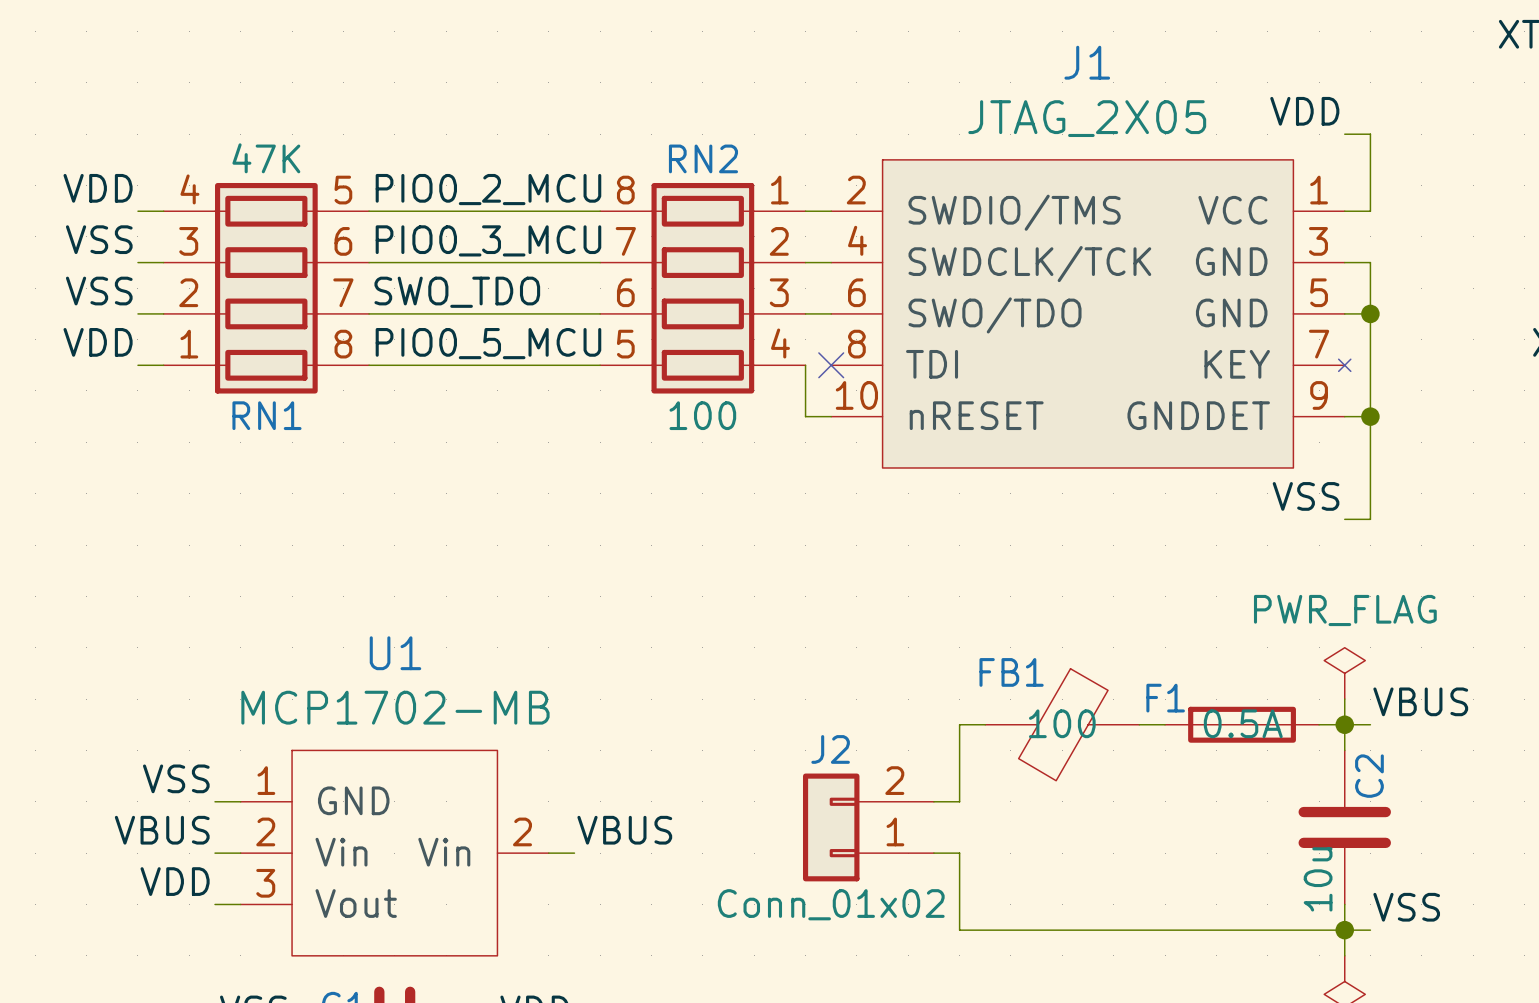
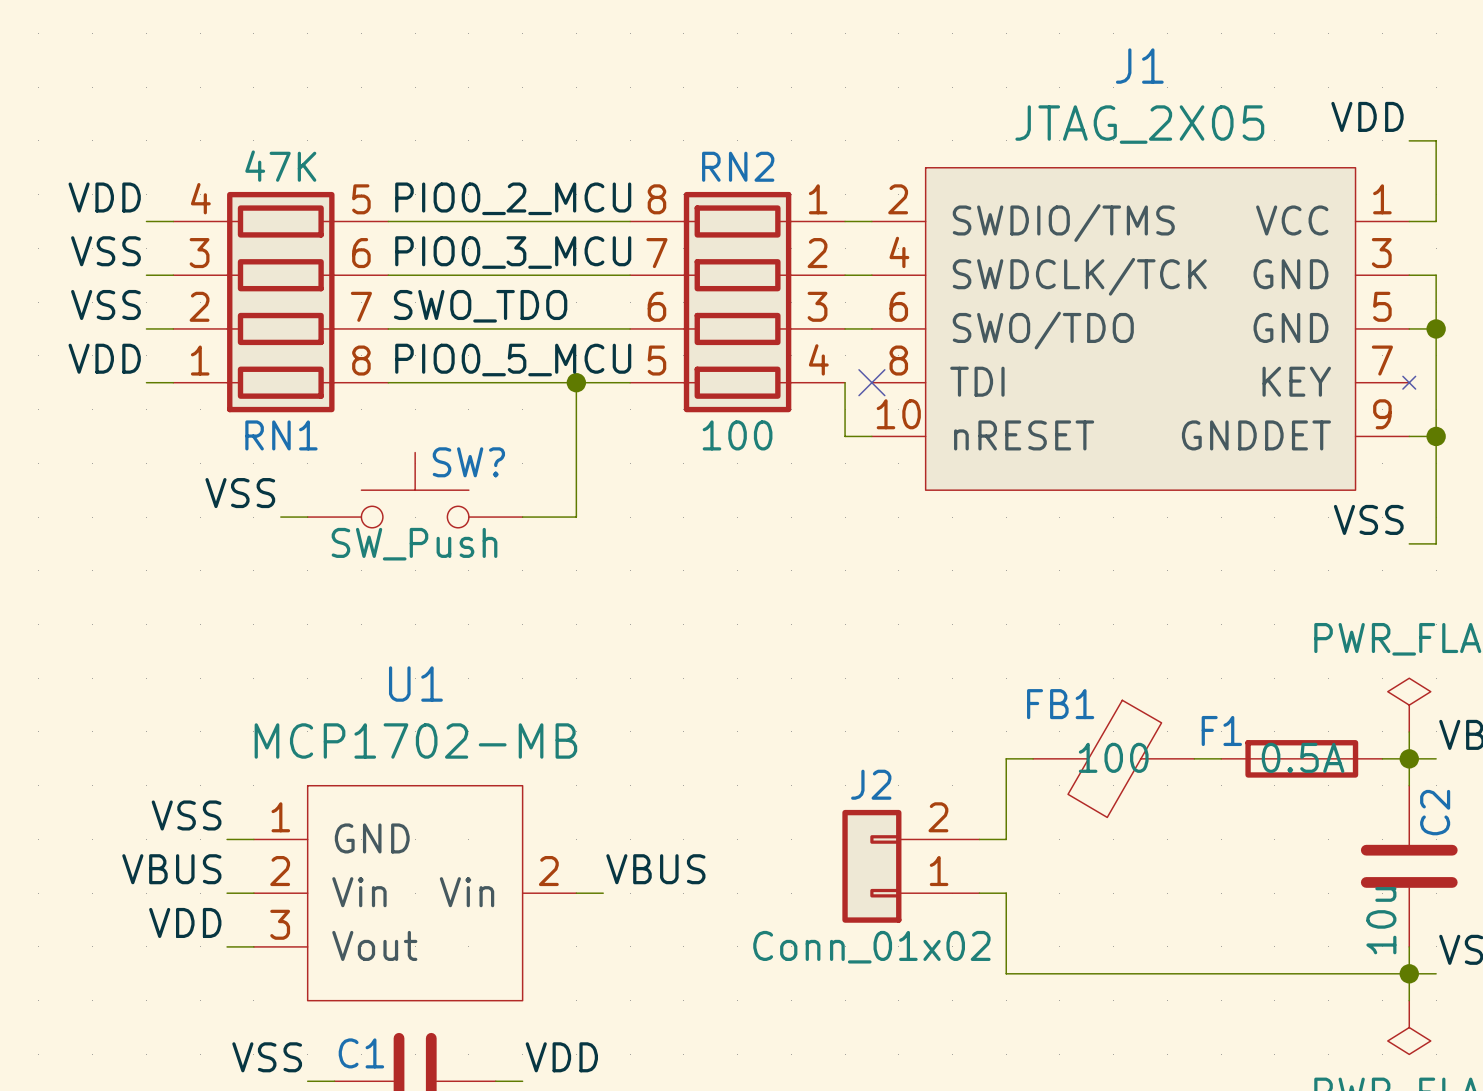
wire: none -> (576, 382) (576, 517) (522, 517)
junction: none -> (576, 382)
SW?: none -> SW_Push (415, 490)
label: none -> VSS (240, 493)
wire: none -> (280, 517) (307, 517)

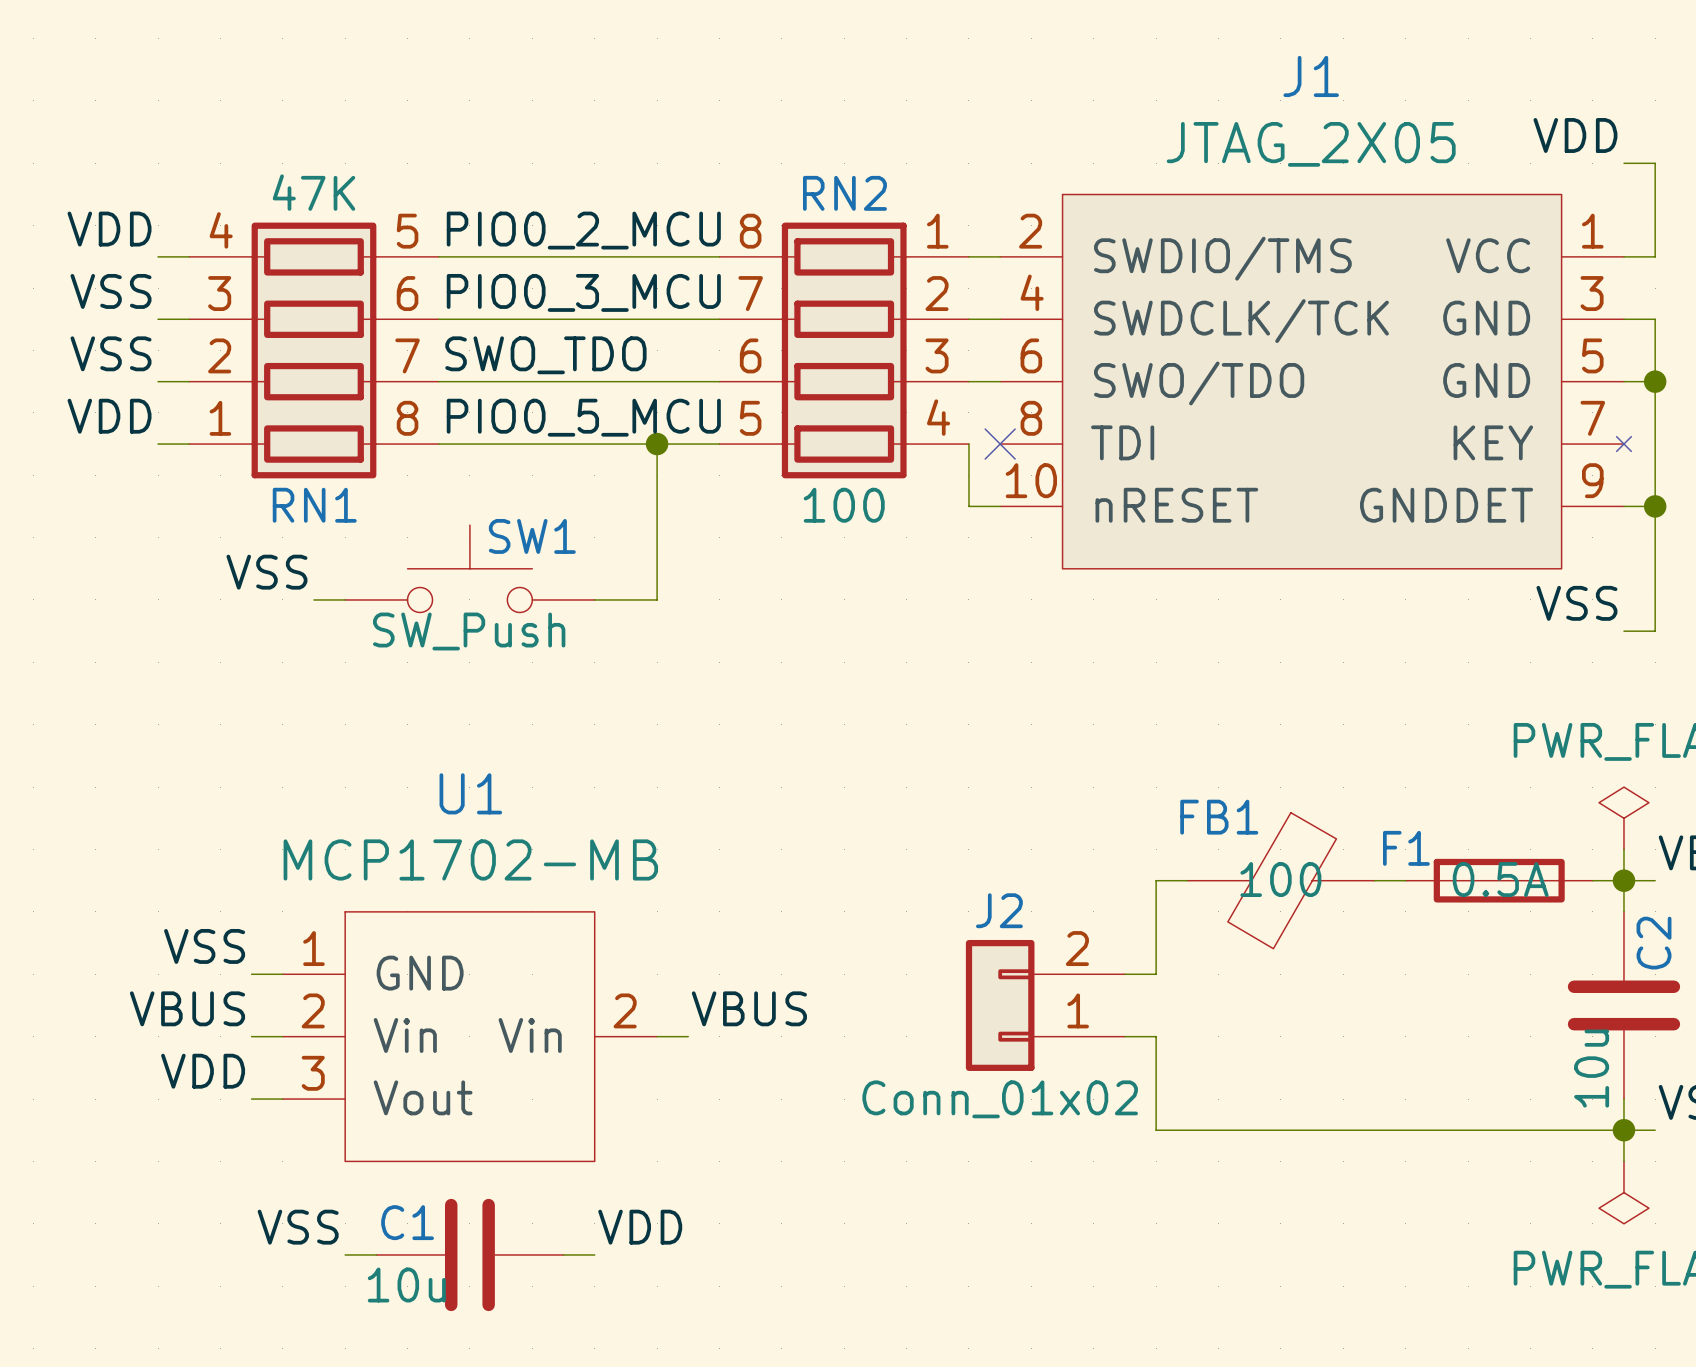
SW? name: SW? (468, 462) -> SW1 (532, 536)

